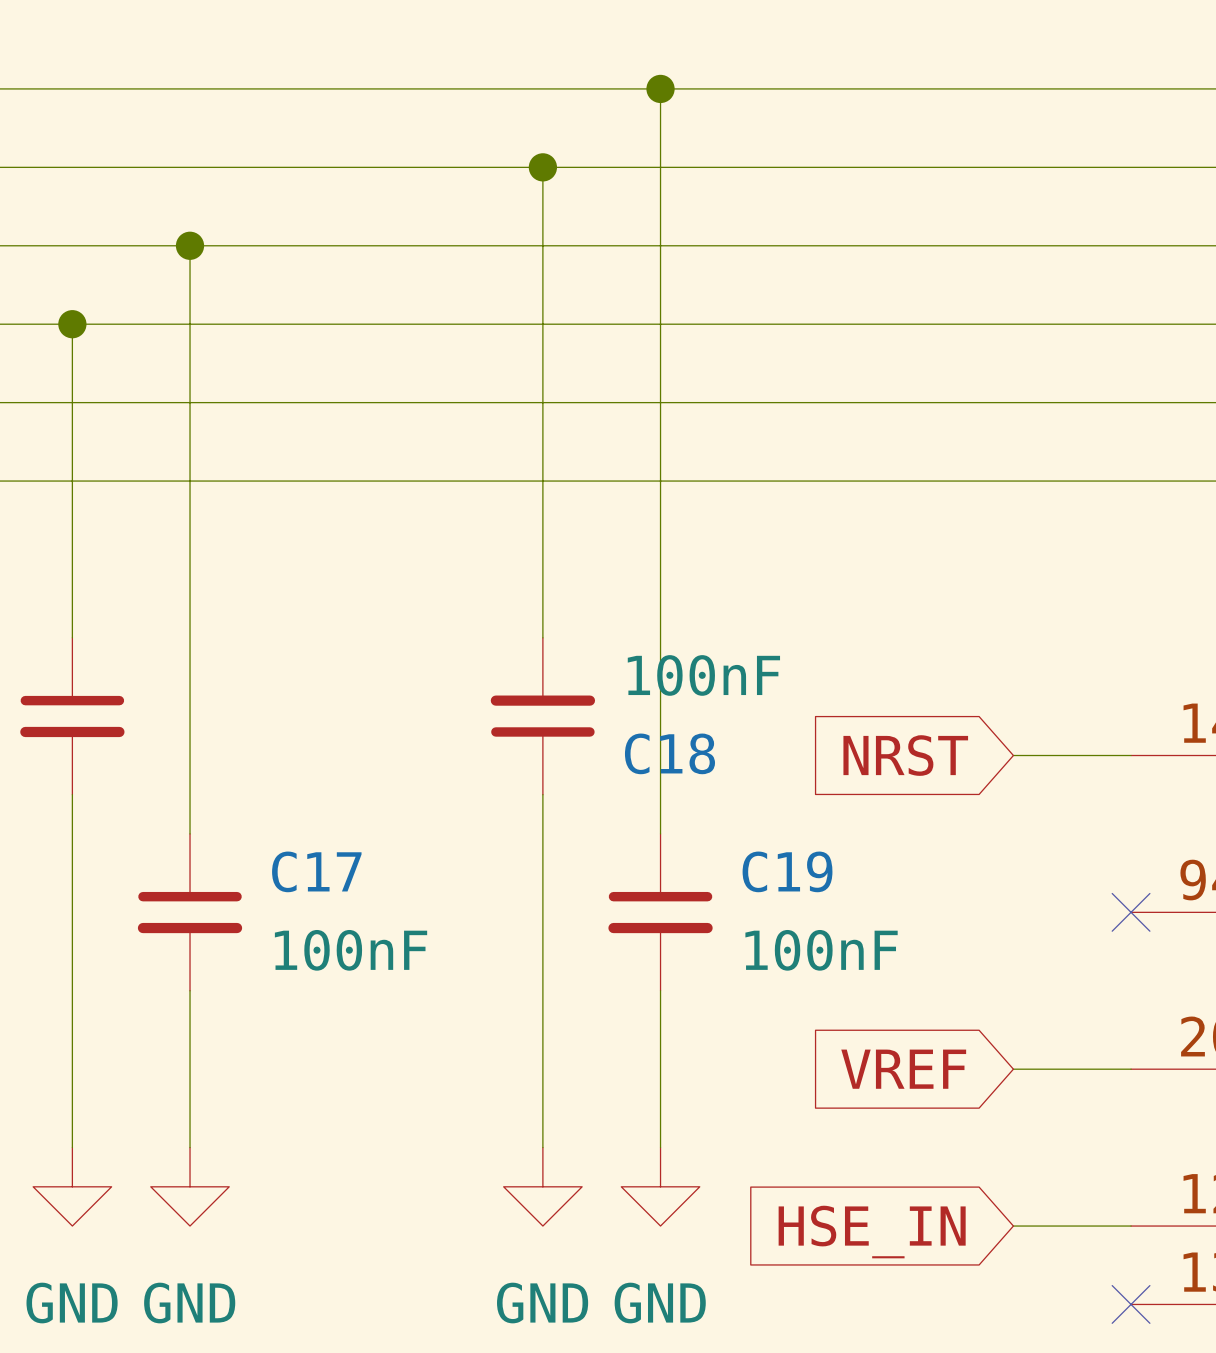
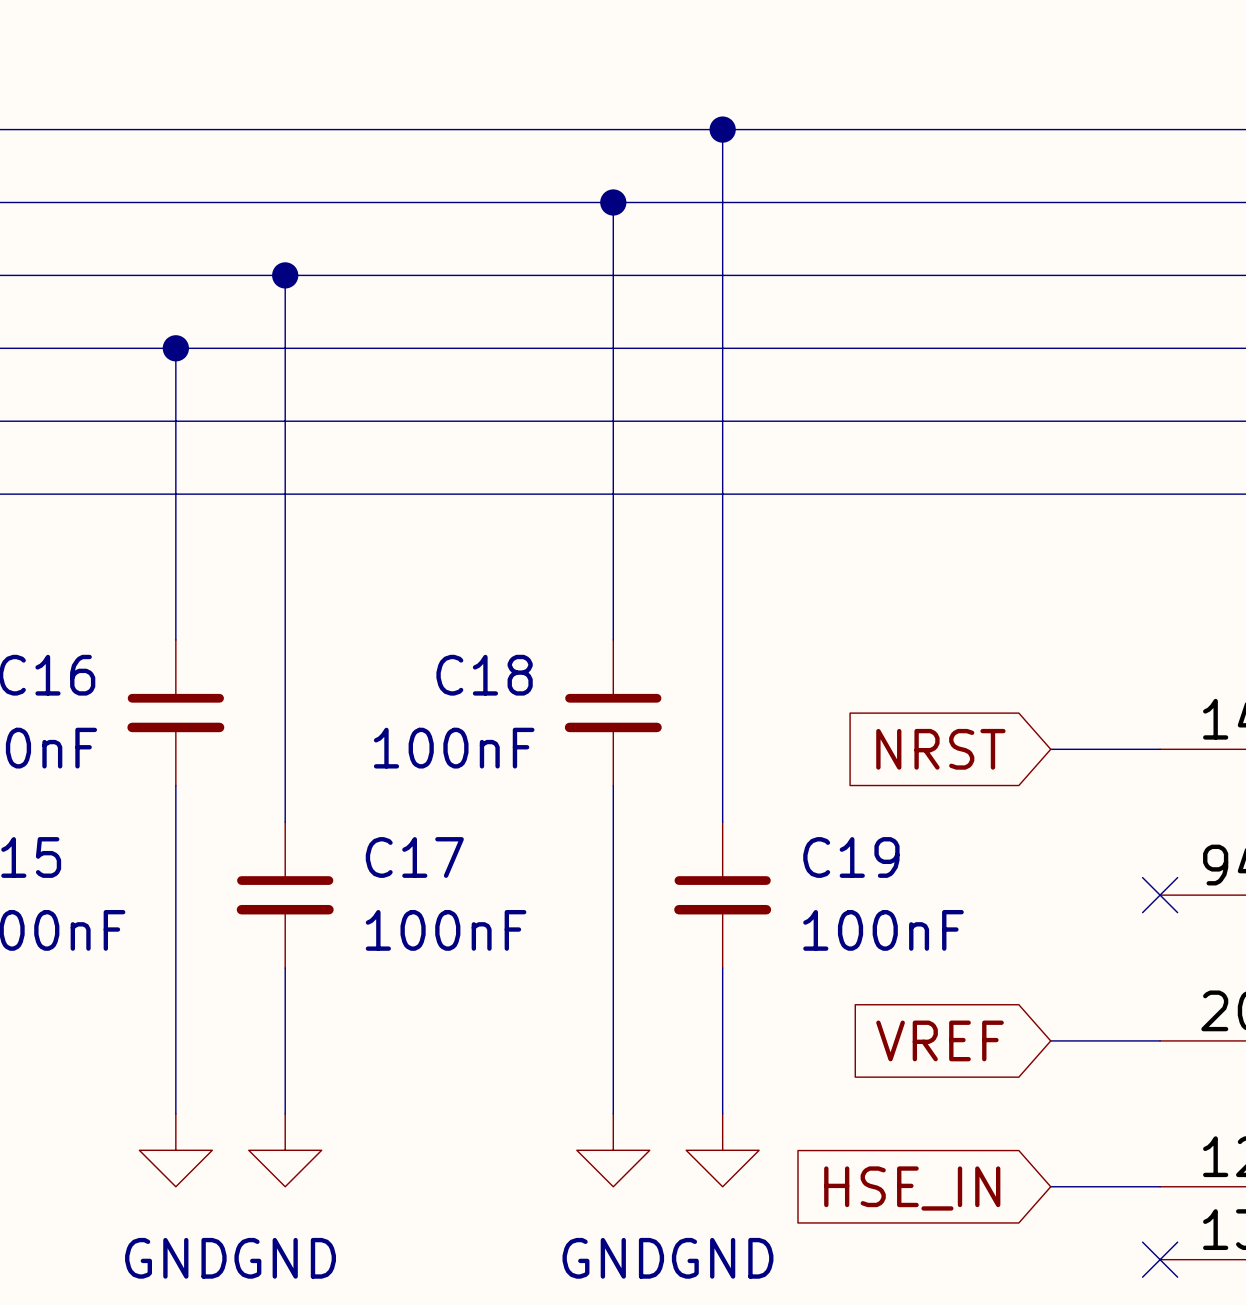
C18 rotation: 0° (542, 716) -> 180° (613, 713)

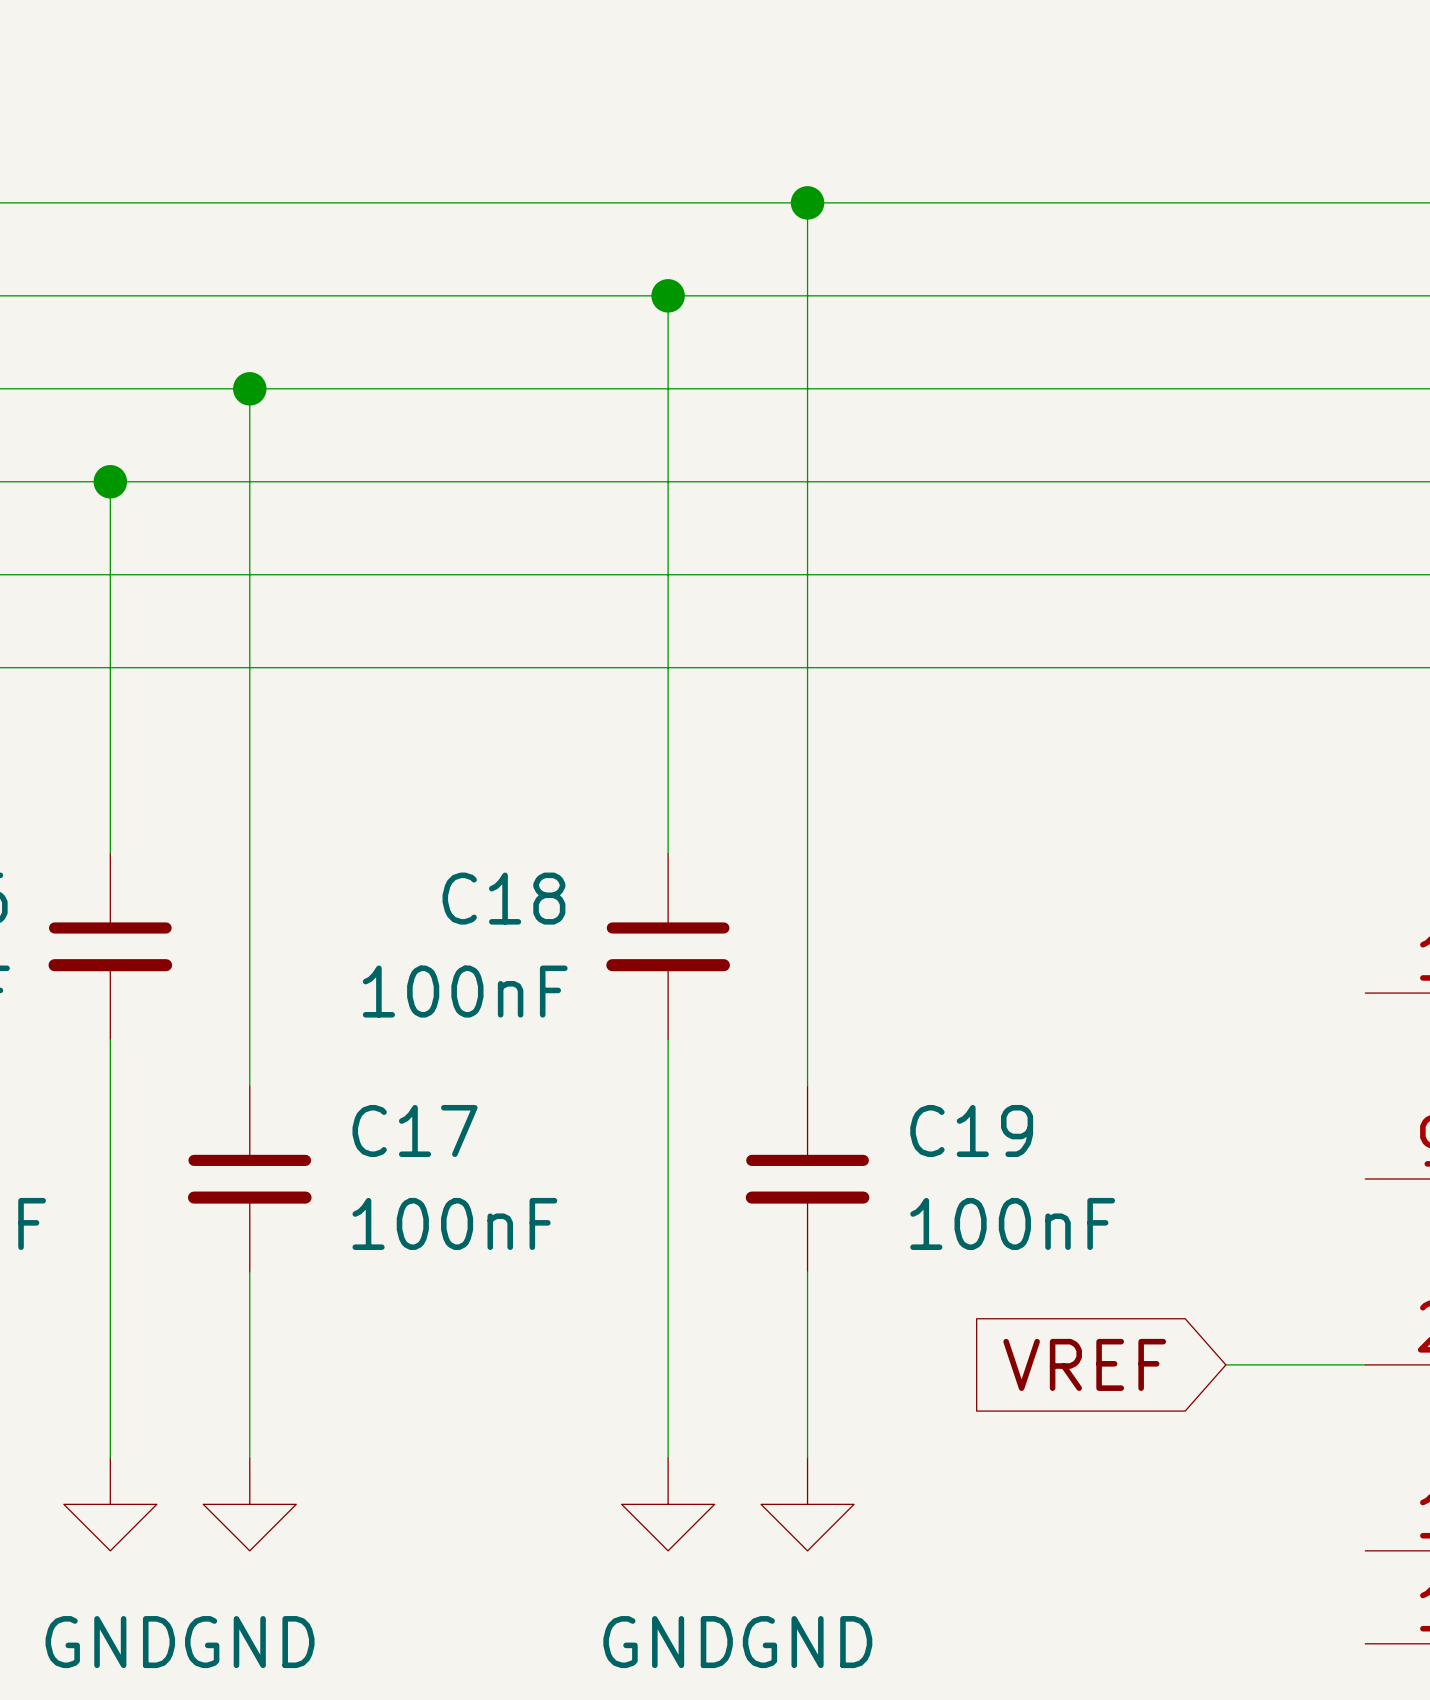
global label: NRST (940, 749) -> none
wire: (1050, 749) (1160, 749) -> none
no-connect mark: (1160, 895) -> none
wire: (1050, 1186) (1160, 1186) -> none
global label: HSE_IN (912, 1188) -> none
no-connect mark: (1160, 1259) -> none

